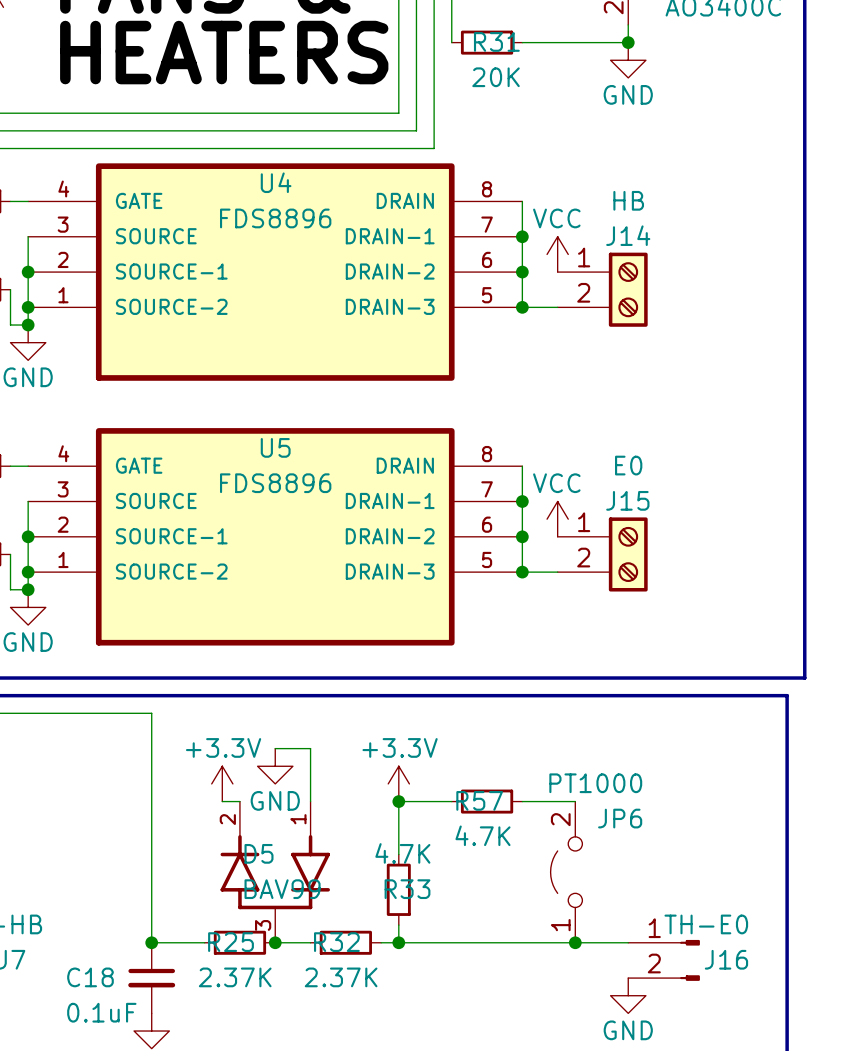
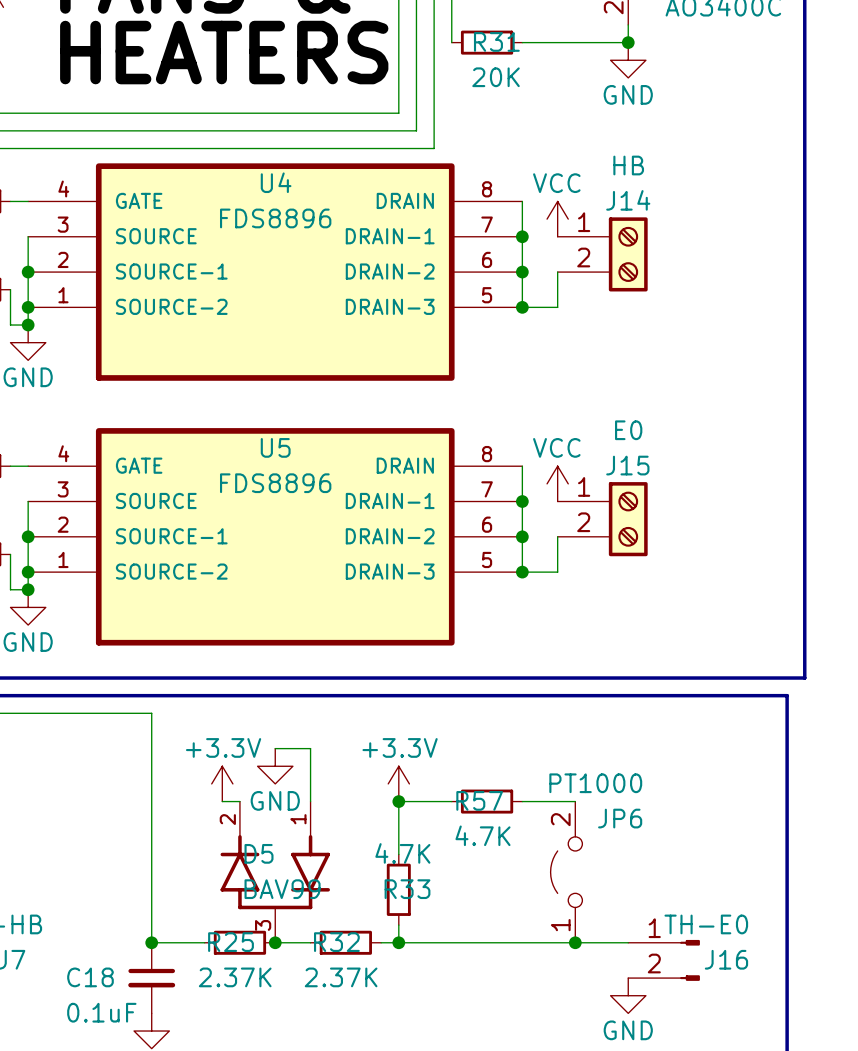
power symbol position: VCC (557, 254) -> VCC (557, 219)
wire: none -> (557, 272) (557, 307)
J14 position: (602, 289) -> (602, 254)
power symbol position: VCC (557, 519) -> VCC (557, 483)
wire: none -> (557, 536) (557, 572)
J15 position: (602, 554) -> (602, 519)

